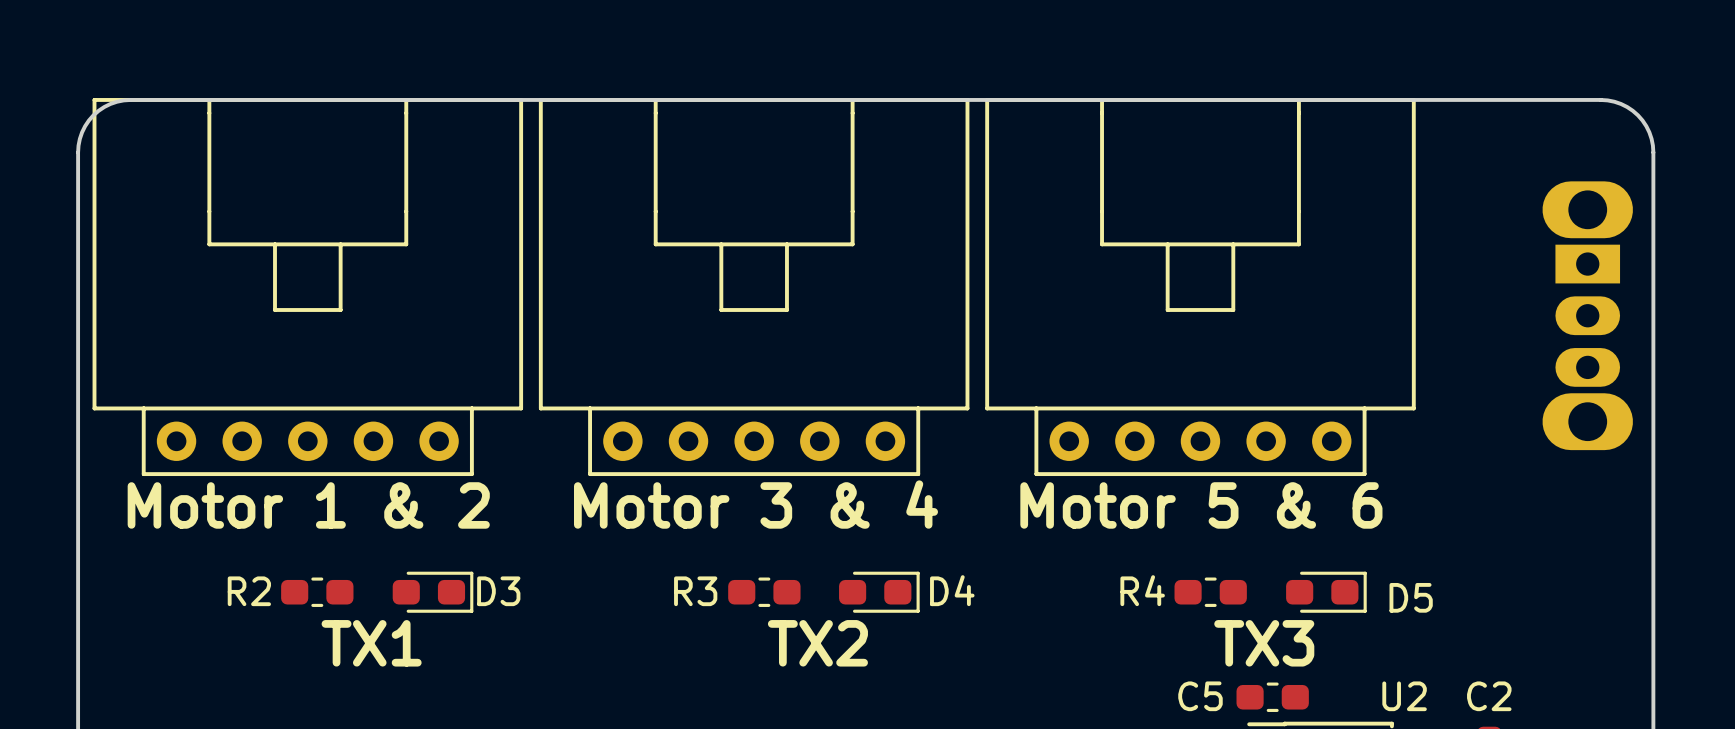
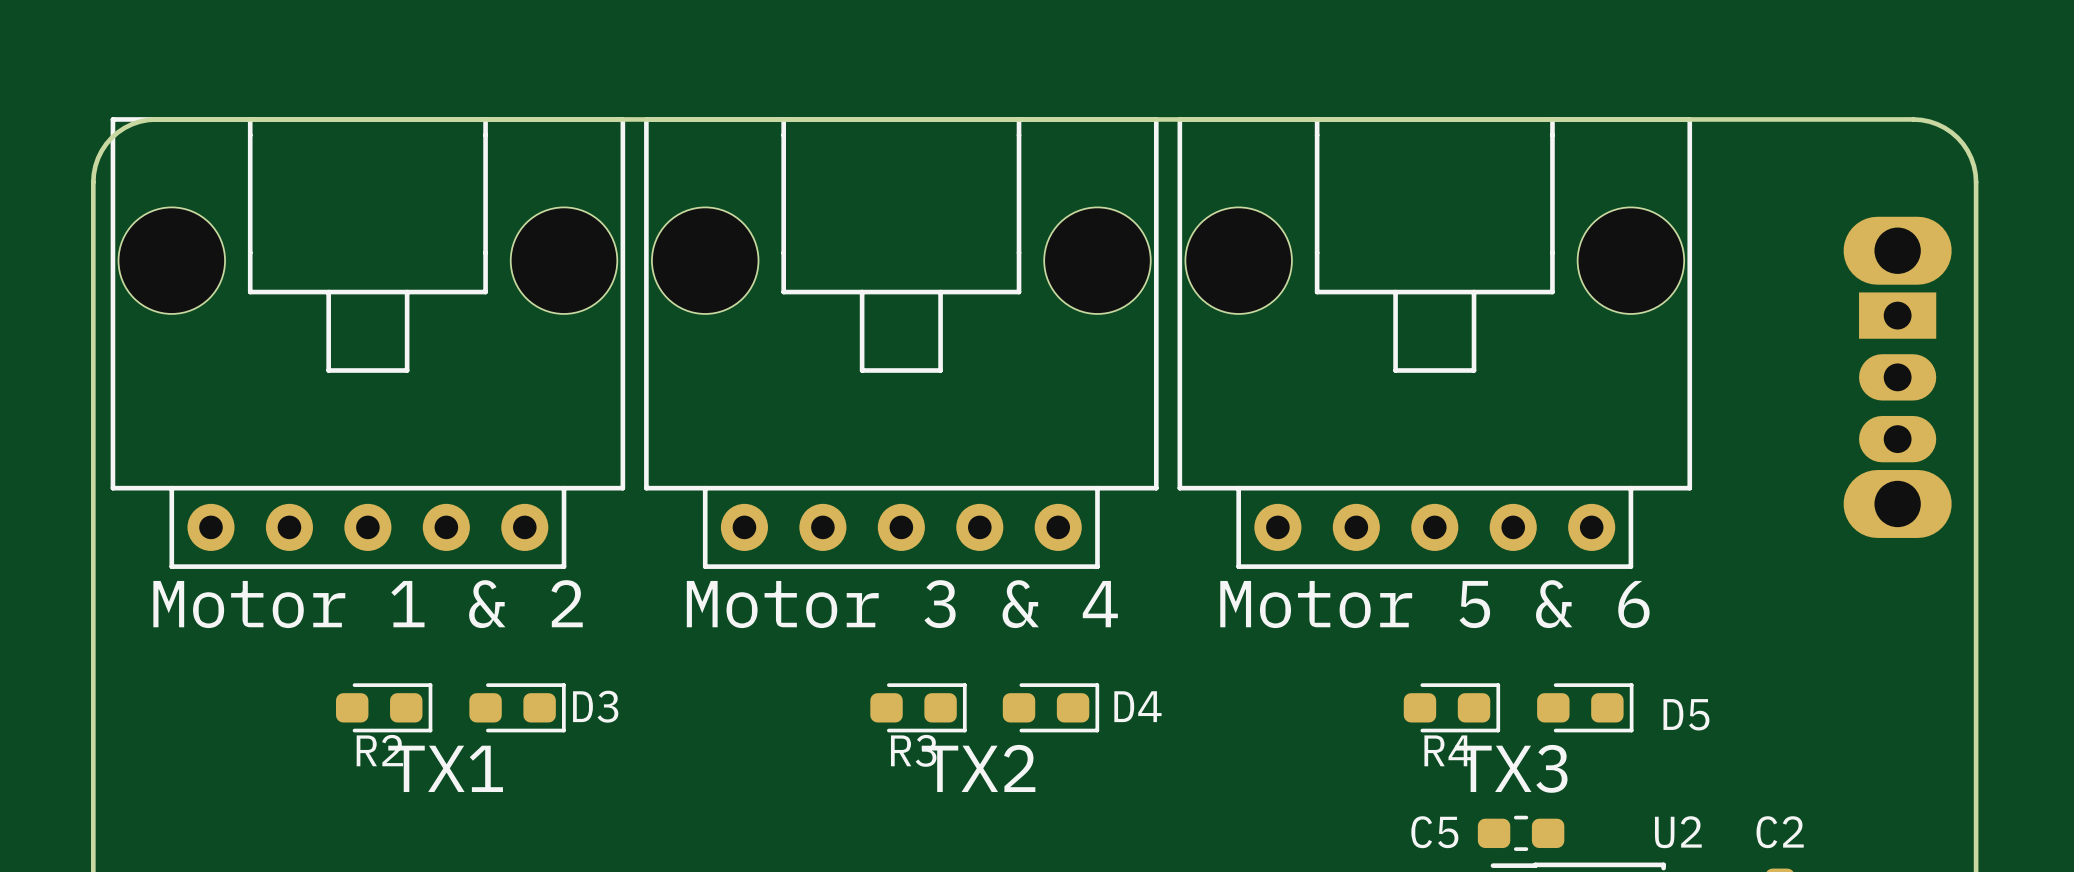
part footprint: [92, 98, 524, 477] -> [110, 117, 626, 569]
part footprint: [538, 98, 970, 477] -> [644, 117, 1159, 569]
part footprint: [985, 98, 1416, 477] -> [1177, 117, 1693, 569]
R2 footprint: [281, 577, 354, 607] -> [335, 683, 433, 733]
R3 footprint: [728, 577, 801, 607] -> [870, 683, 967, 733]
R4 footprint: [1174, 577, 1247, 607] -> [1403, 683, 1501, 733]
R4 name position: R4 (1142, 590) -> R4 (1448, 750)
R2 name position: R2 (249, 591) -> R2 (379, 750)
R3 name position: R3 (695, 591) -> R3 (913, 750)

